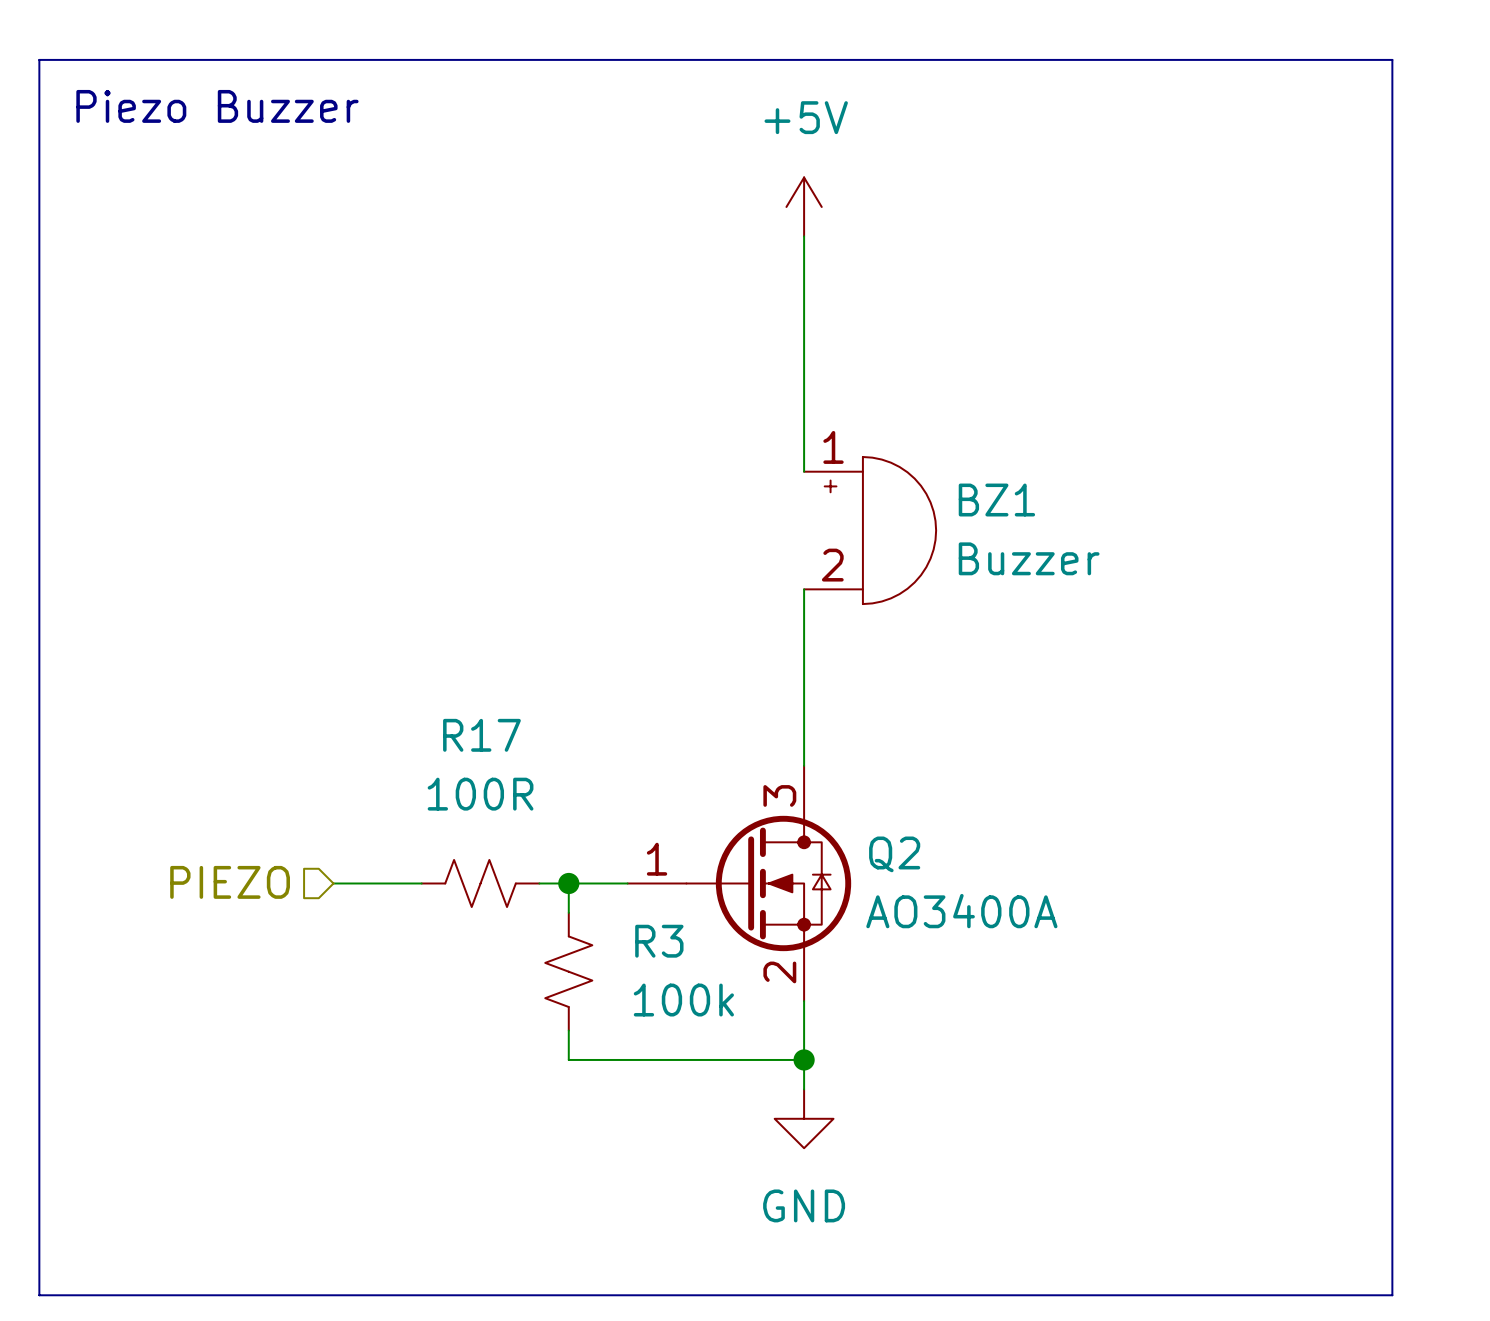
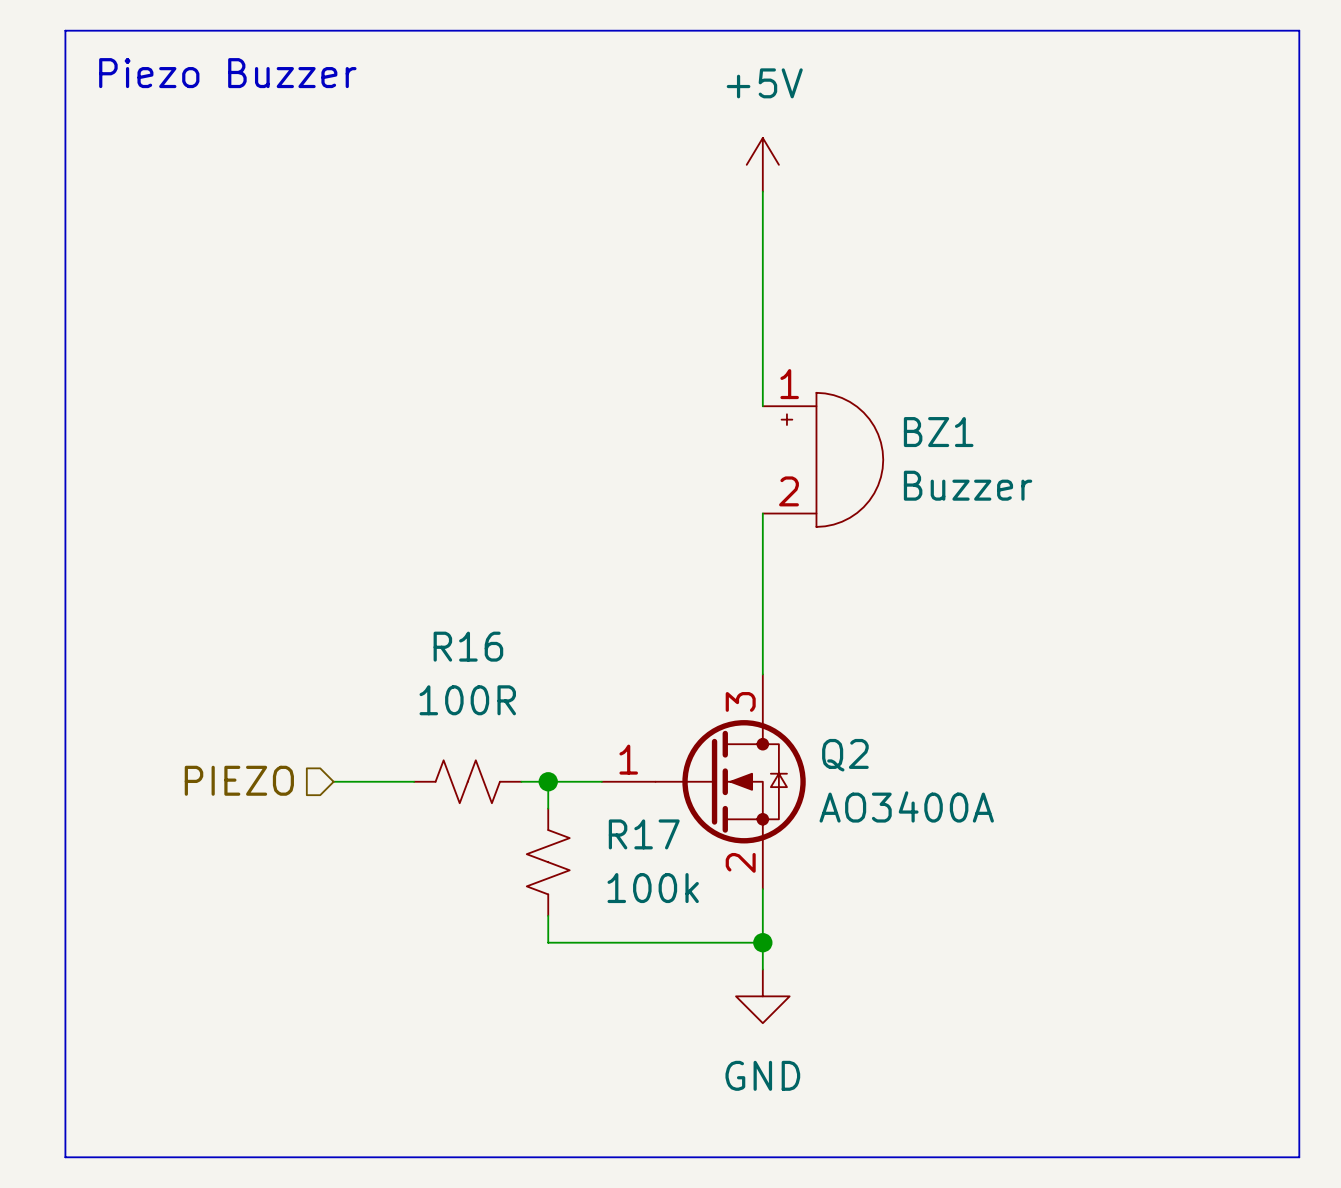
R17 name: R17 (481, 735) -> R16 (468, 646)
R3 name: R3 (659, 941) -> R17 (644, 834)

